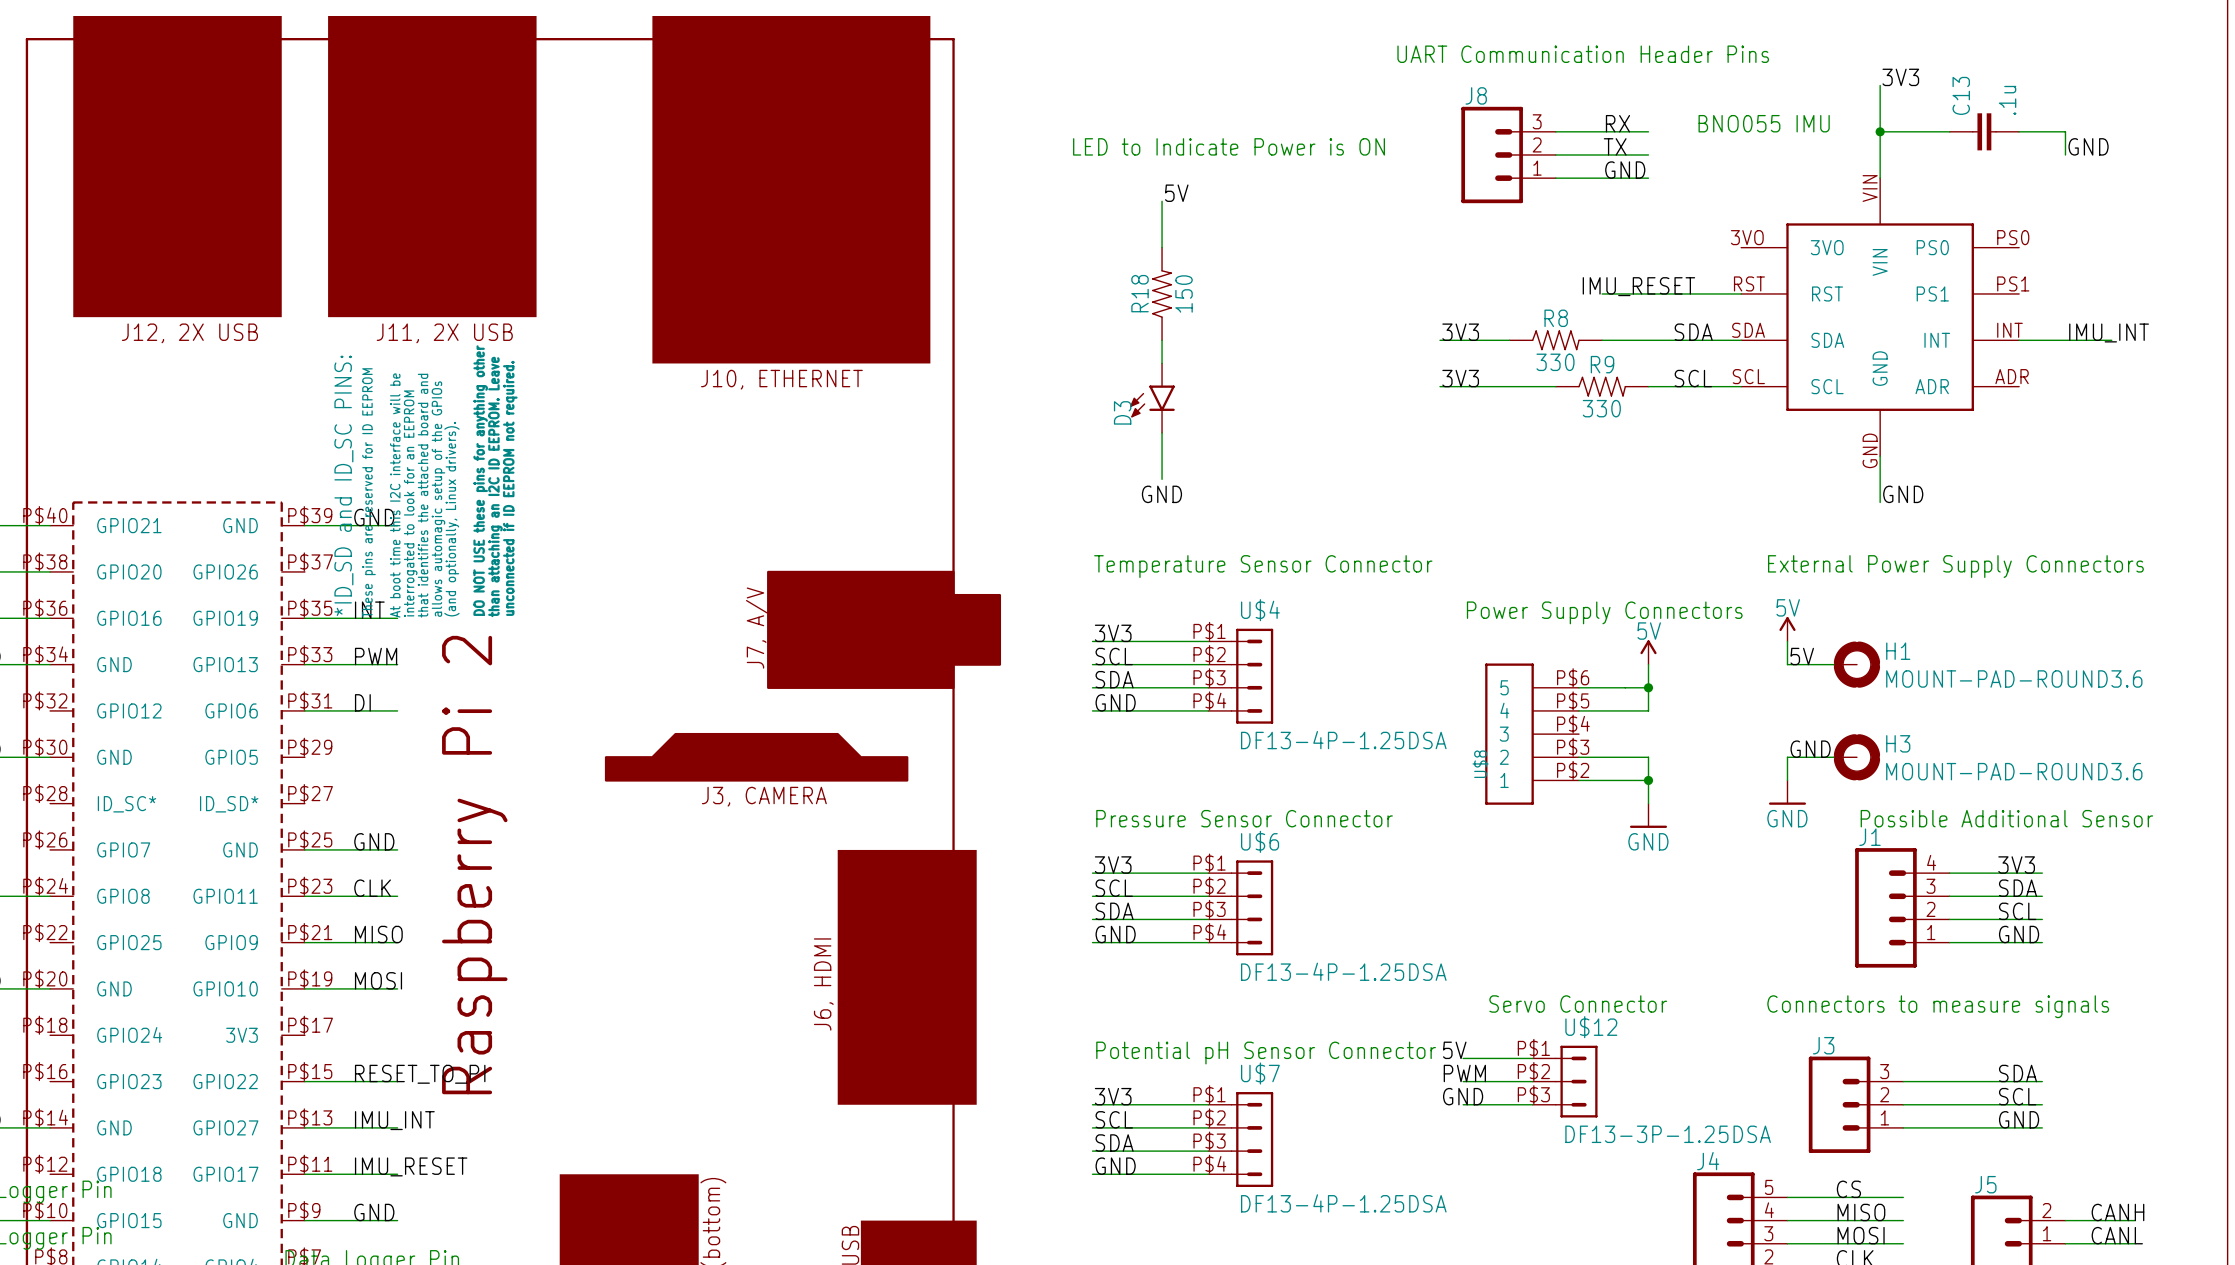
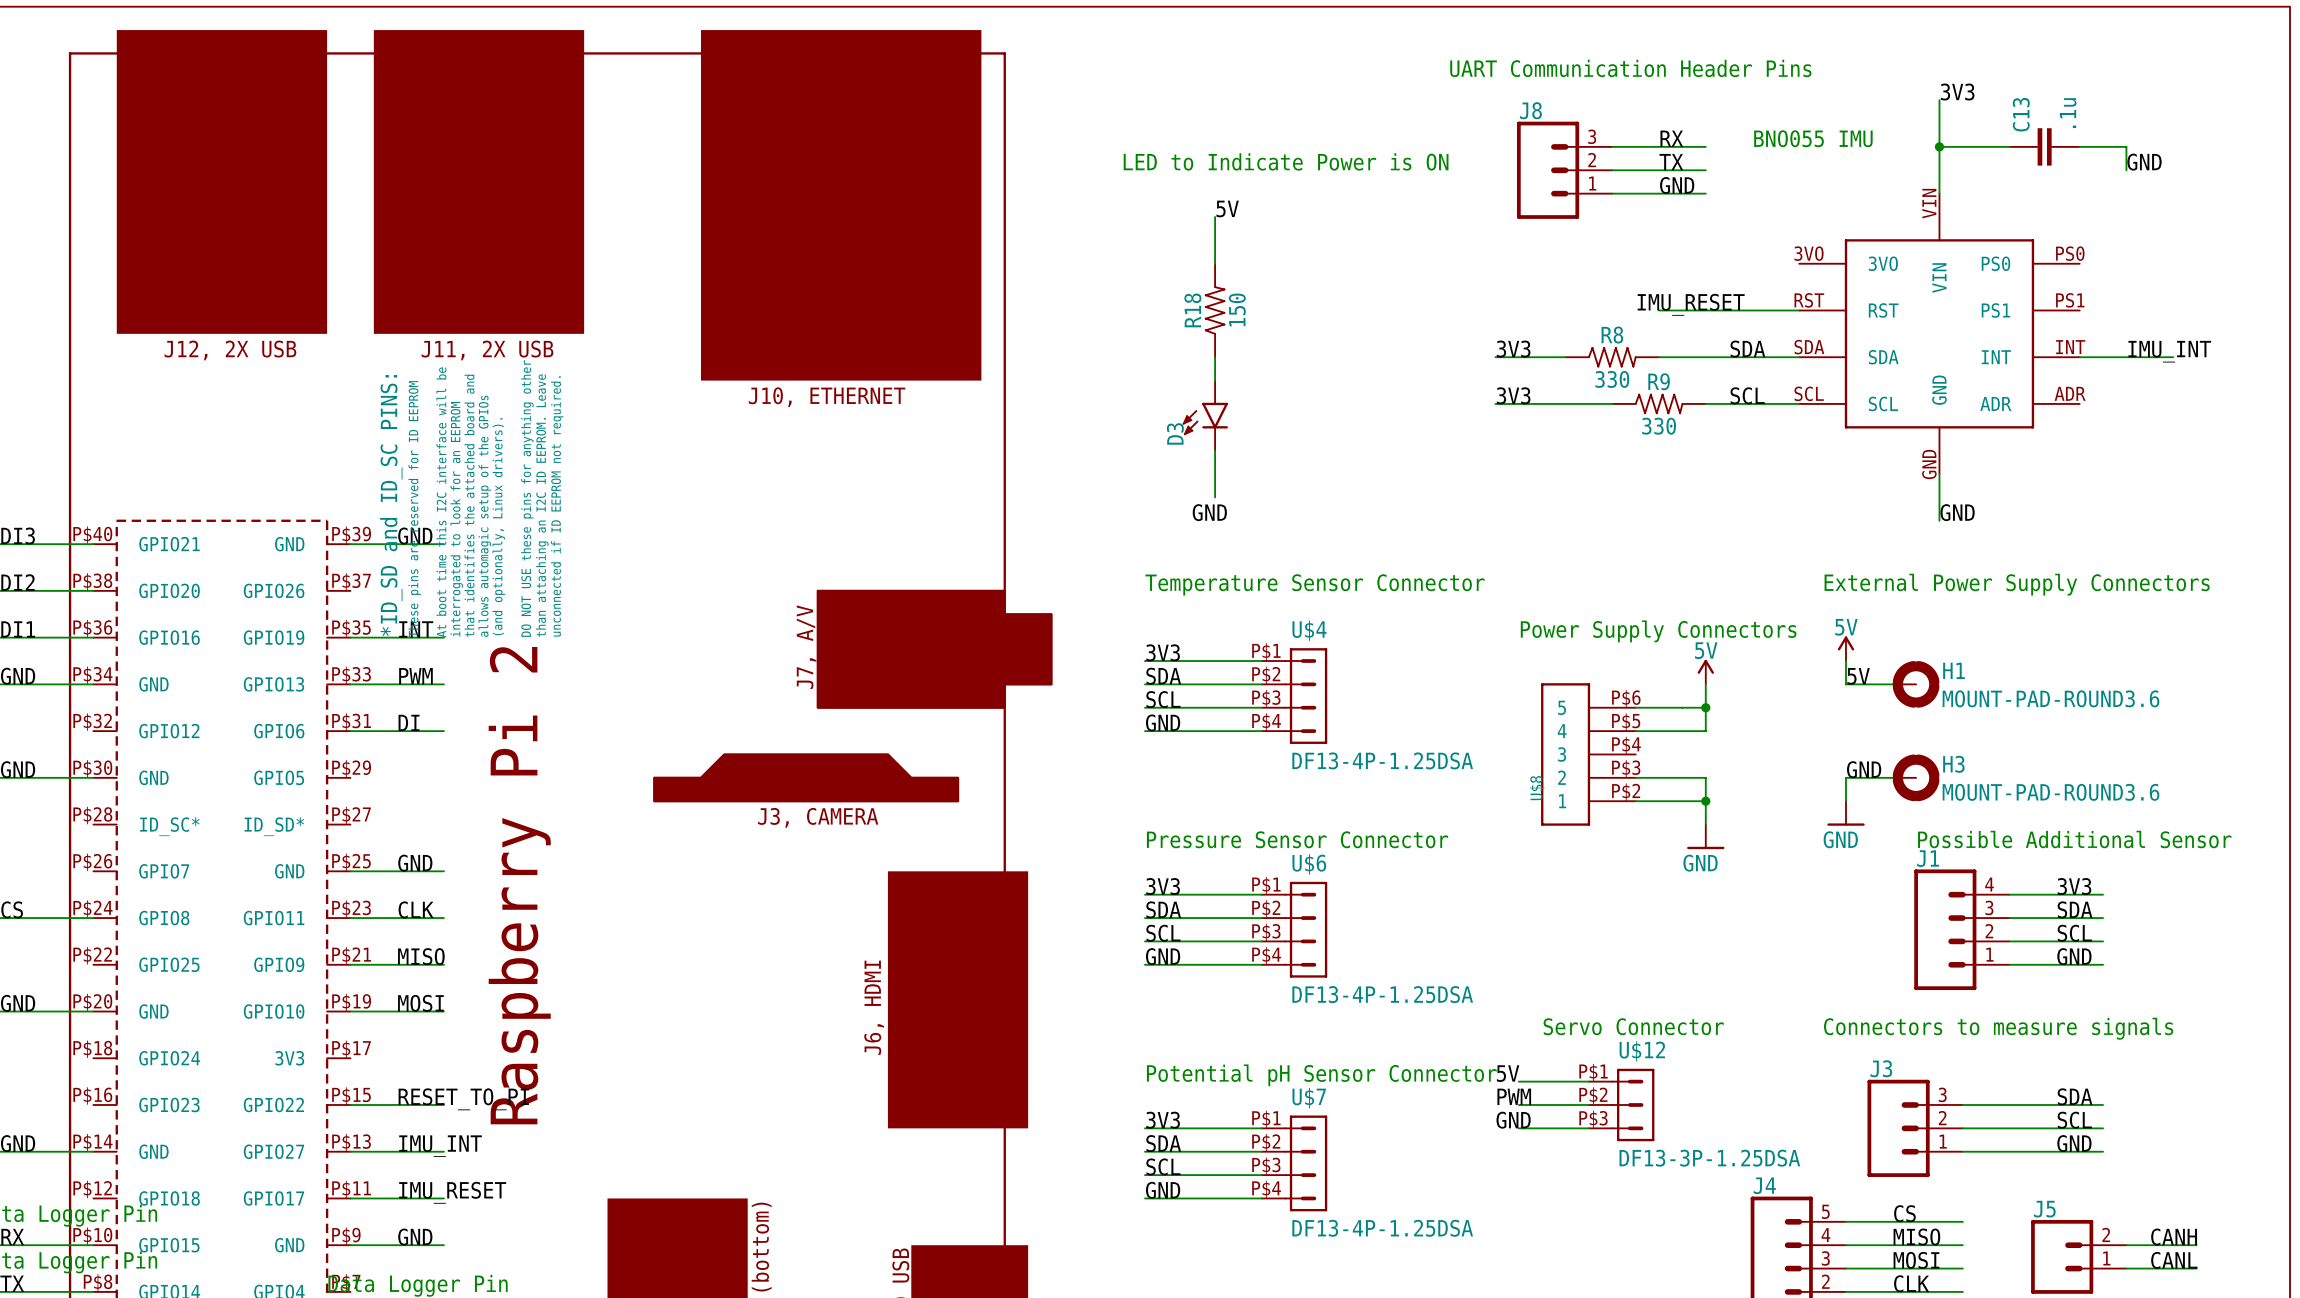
label: SCL (1114, 656) -> SDA (1163, 676)
label: SDA (1114, 679) -> SCL (1163, 699)
label: SCL (1114, 888) -> SDA (1163, 909)
label: SDA (1114, 911) -> SCL (1163, 933)
label: SCL (1114, 1119) -> SDA (1163, 1143)
label: SDA (1114, 1142) -> SCL (1163, 1166)

